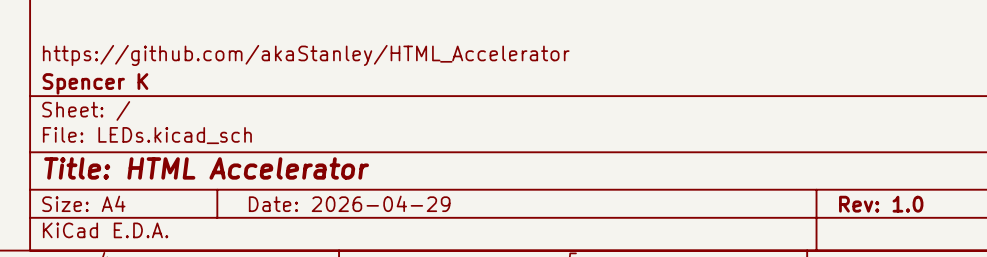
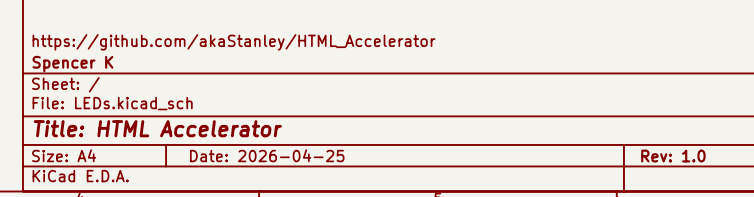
title block: Date: 2026-04-29 (349, 203) -> Date: 2026-04-25 (267, 155)

